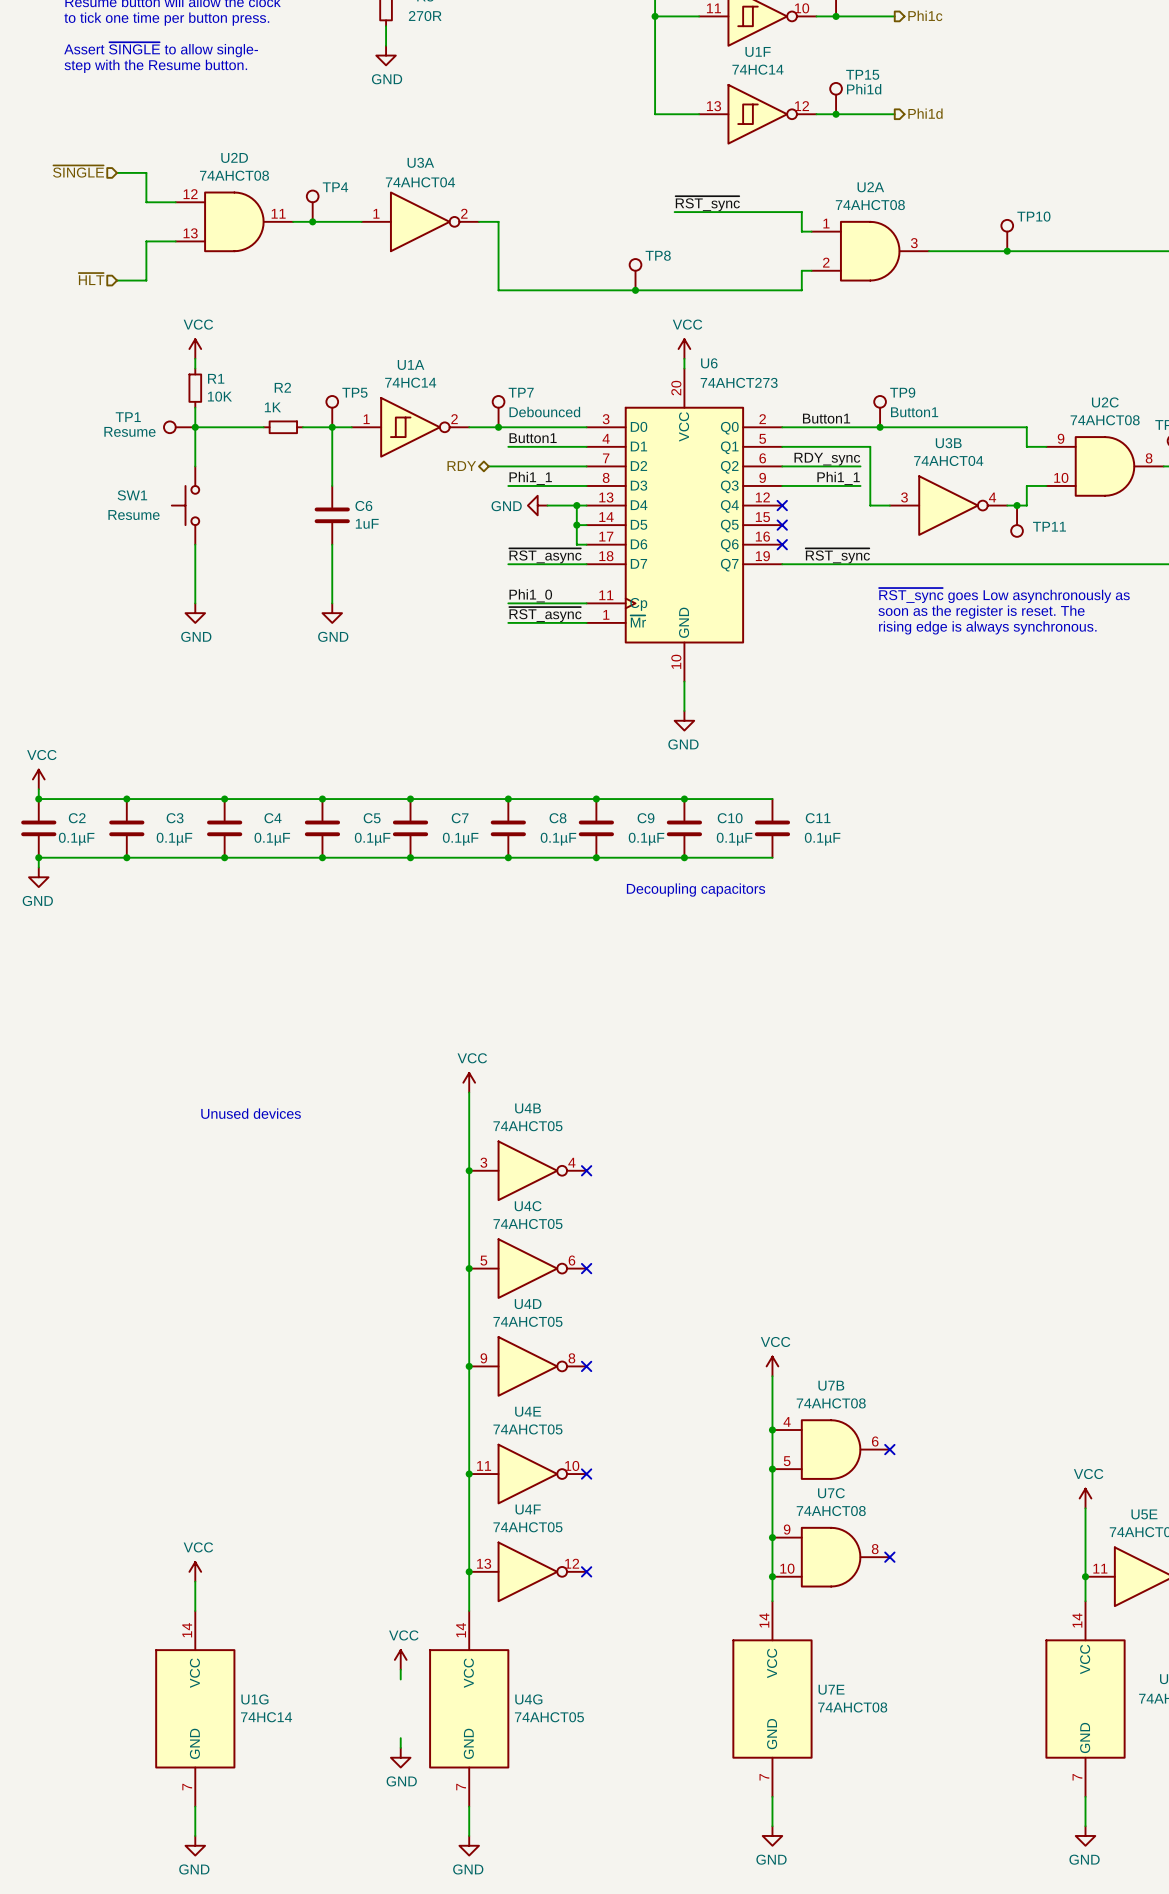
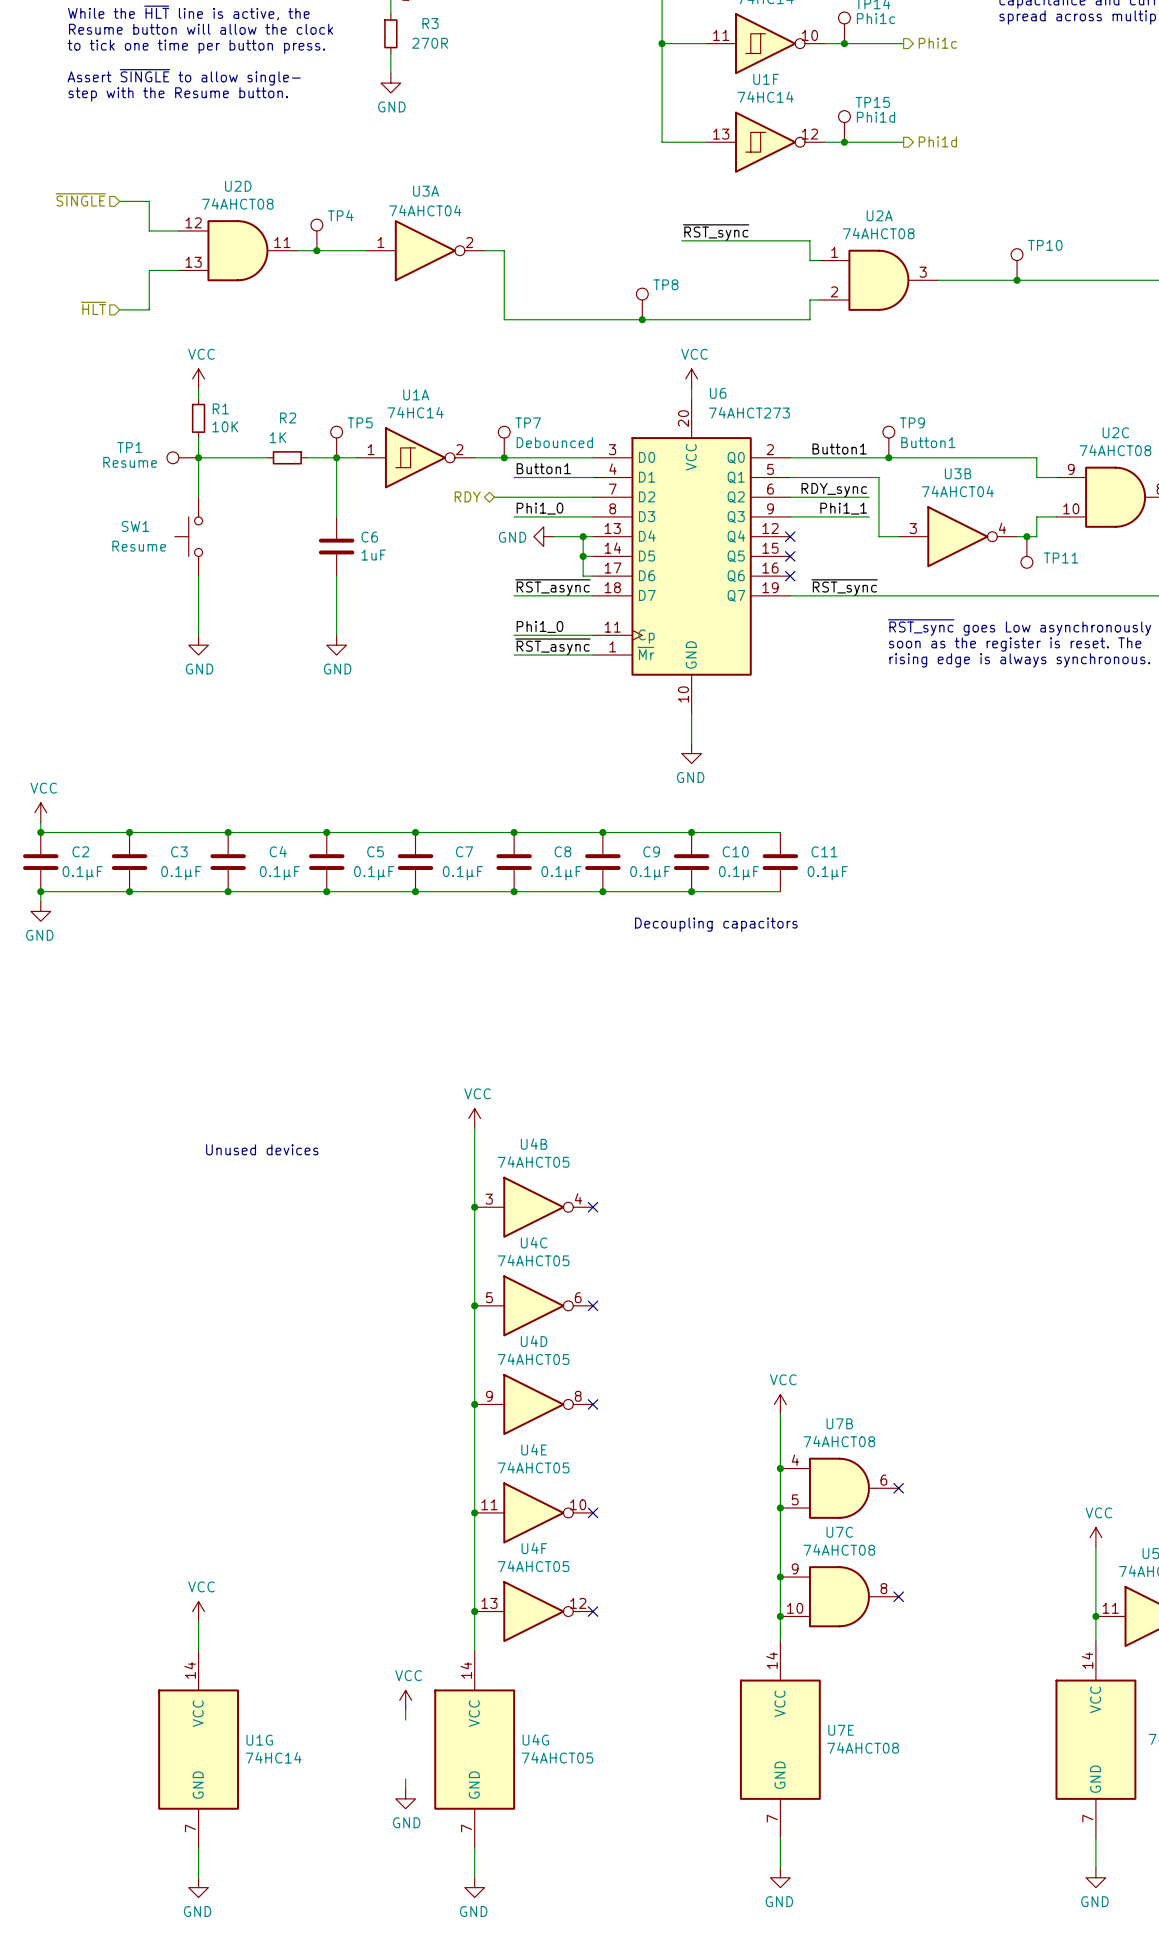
label: Phi1_1 (530, 478) -> Phi1_0 (540, 508)

